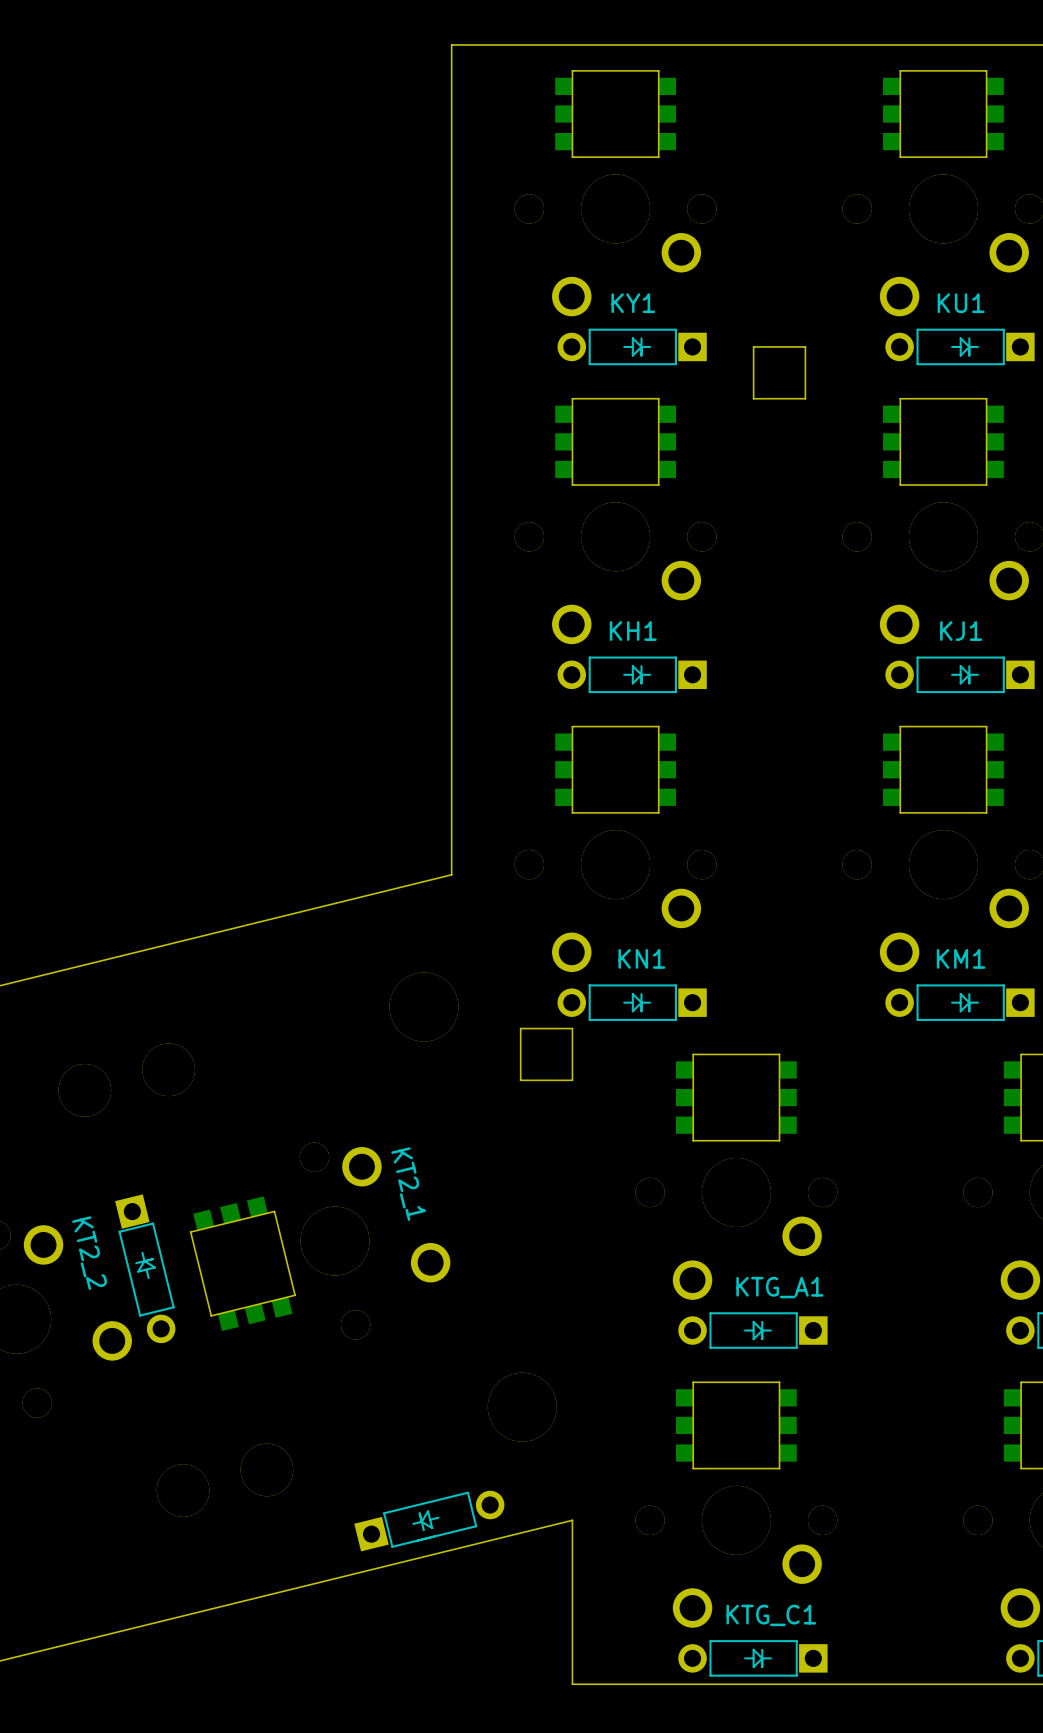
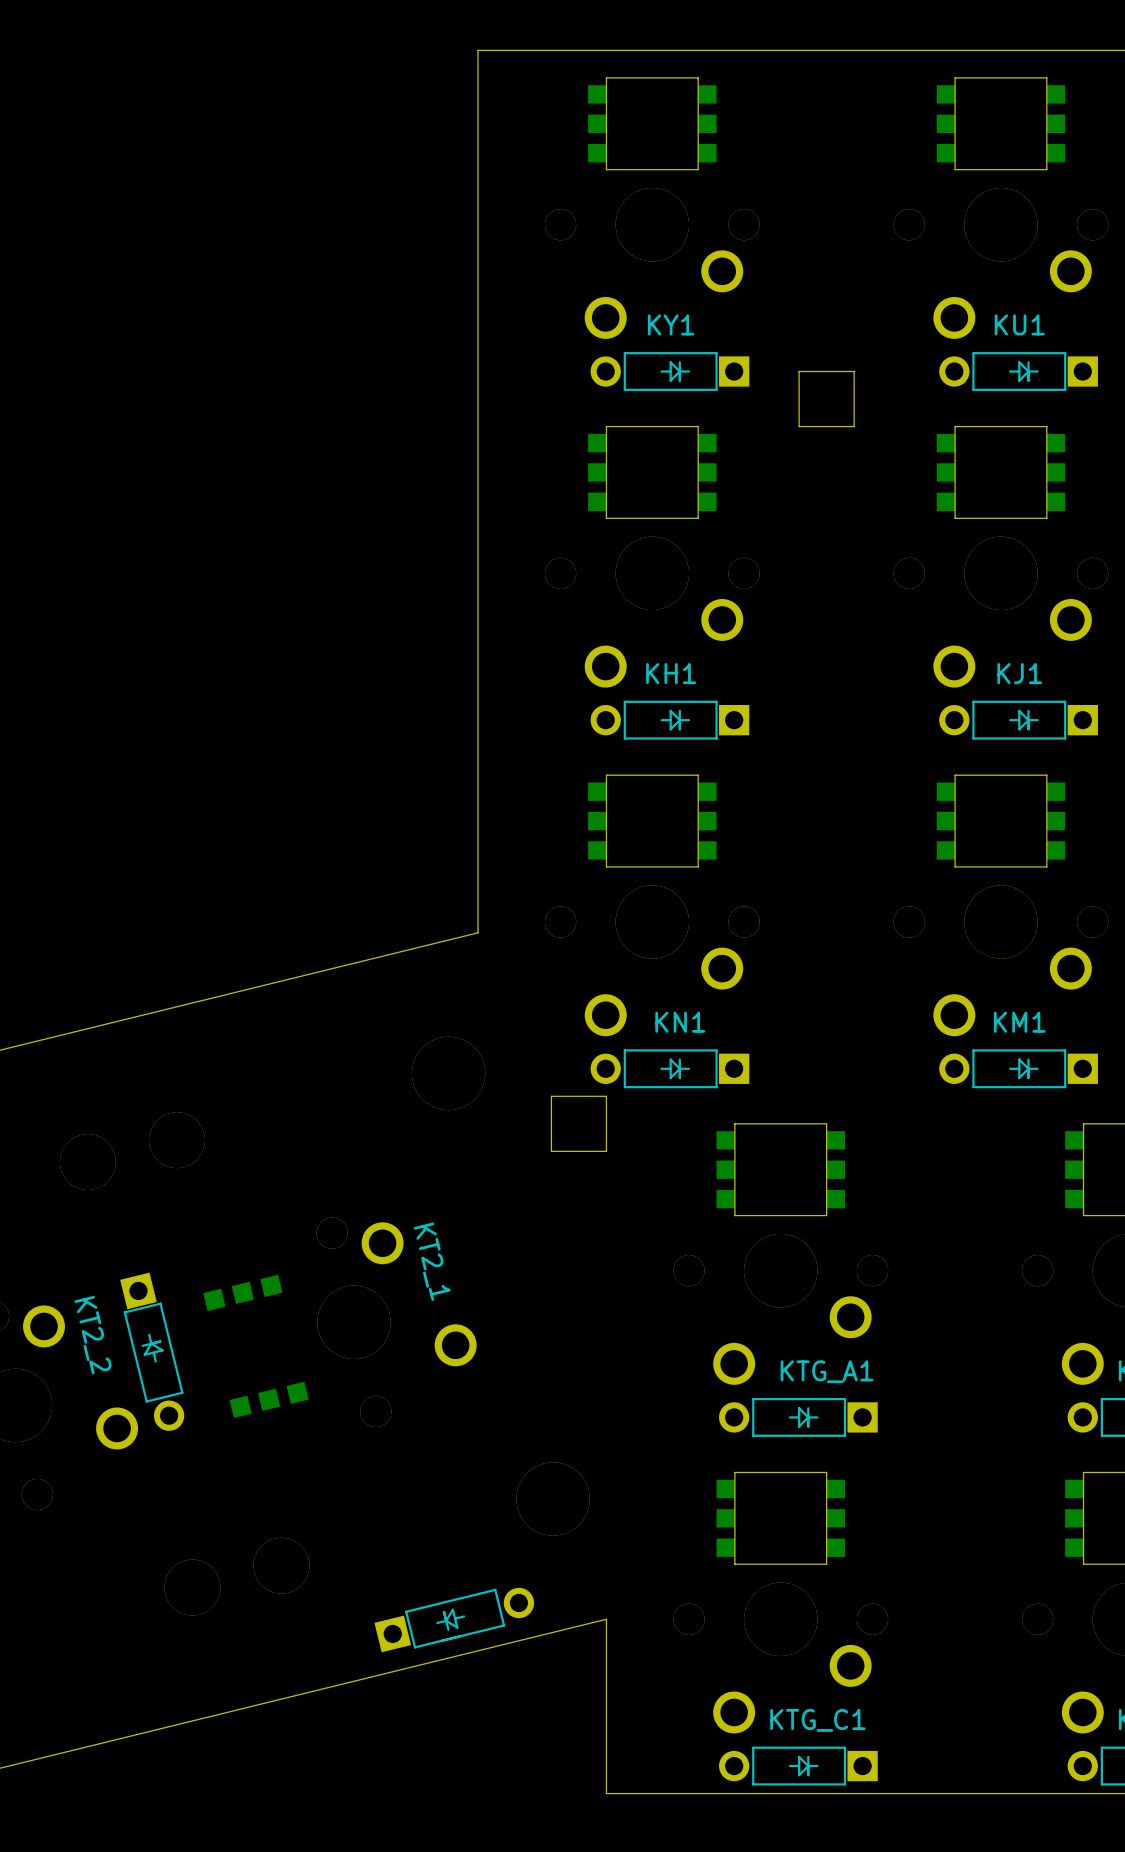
board edge: (274, 1211) (190, 1232) (211, 1315) (295, 1295) (274, 1211) -> none

